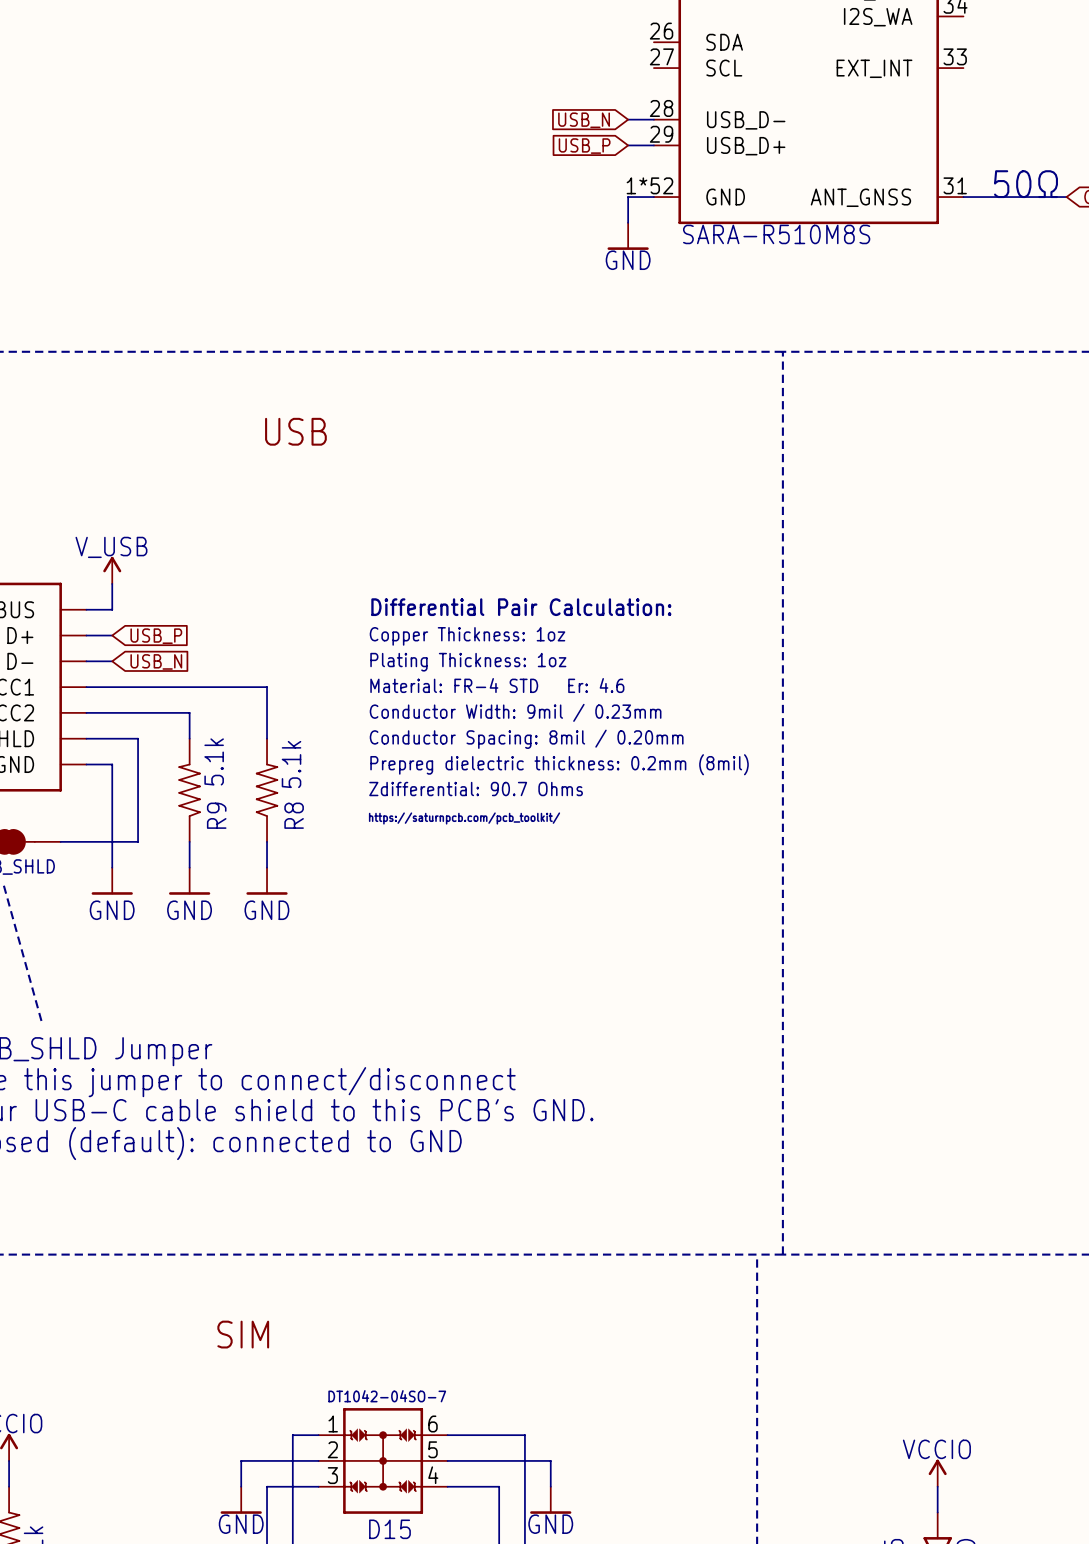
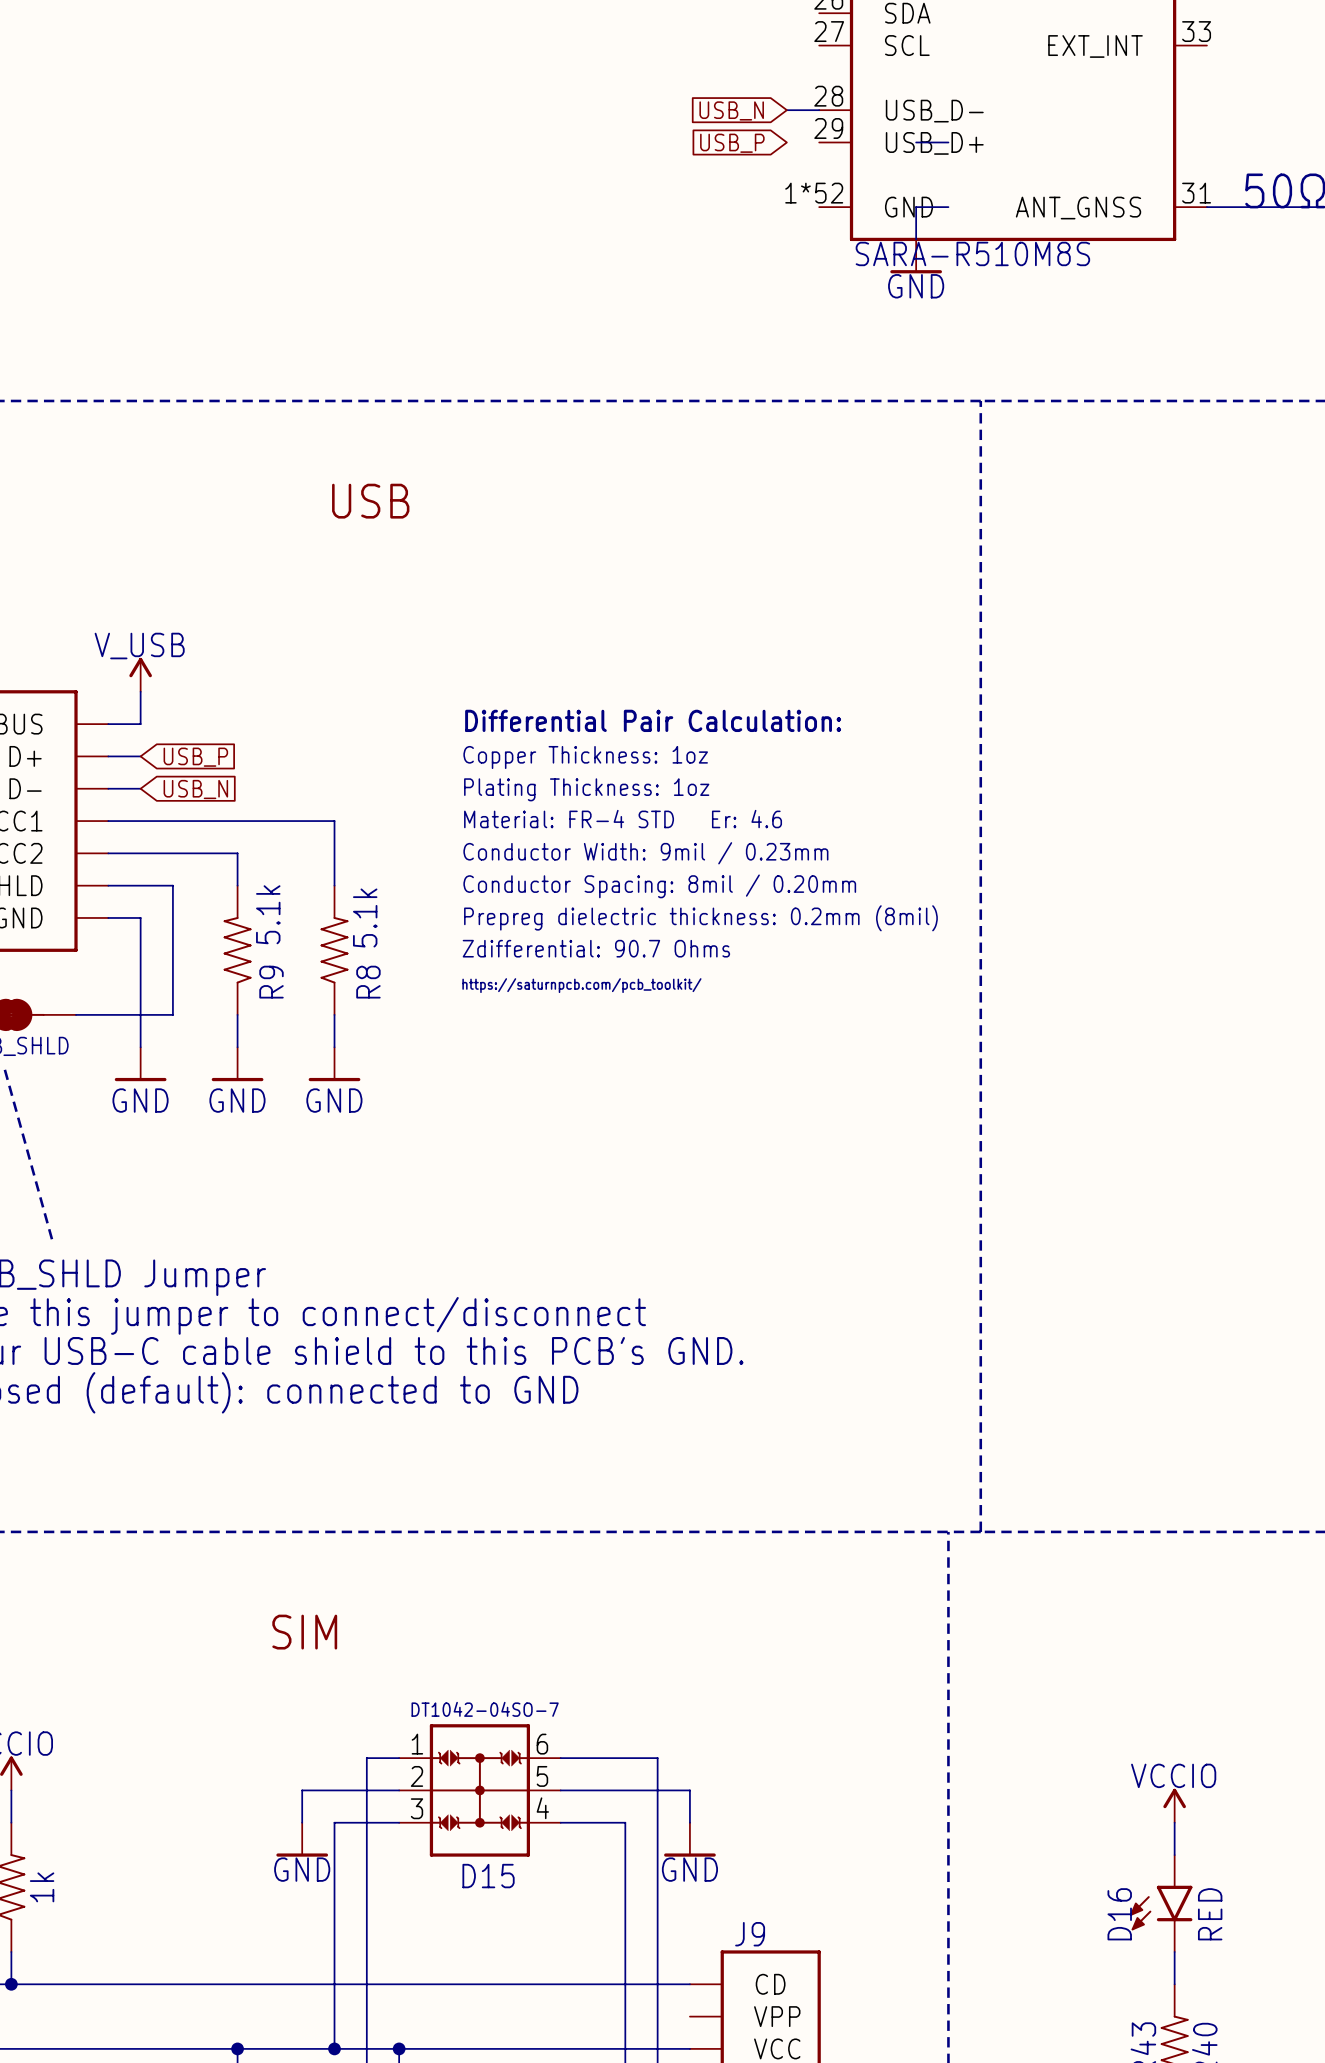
wire: (628, 145) (653, 145) -> (916, 142) (948, 142)
wire: (653, 197) (628, 197) (628, 222) -> (948, 207) (916, 207) (916, 239)
power symbol position: GND (628, 236) -> GND (916, 256)

